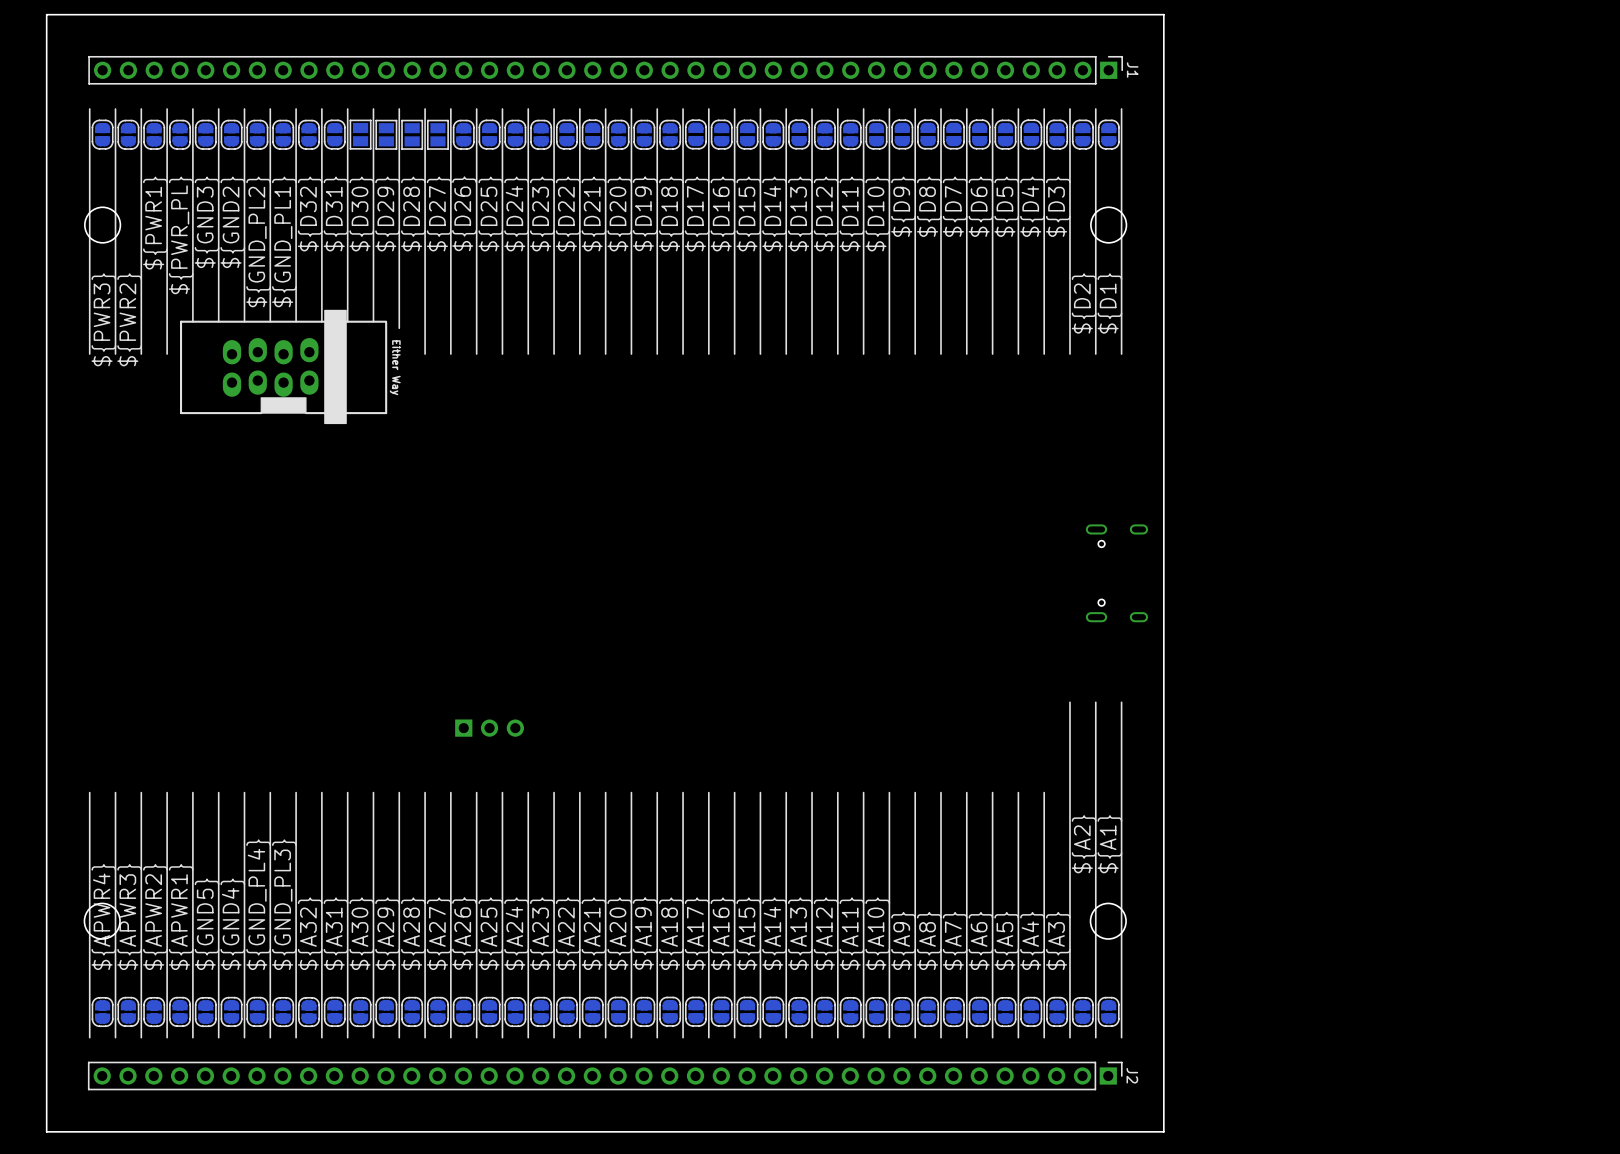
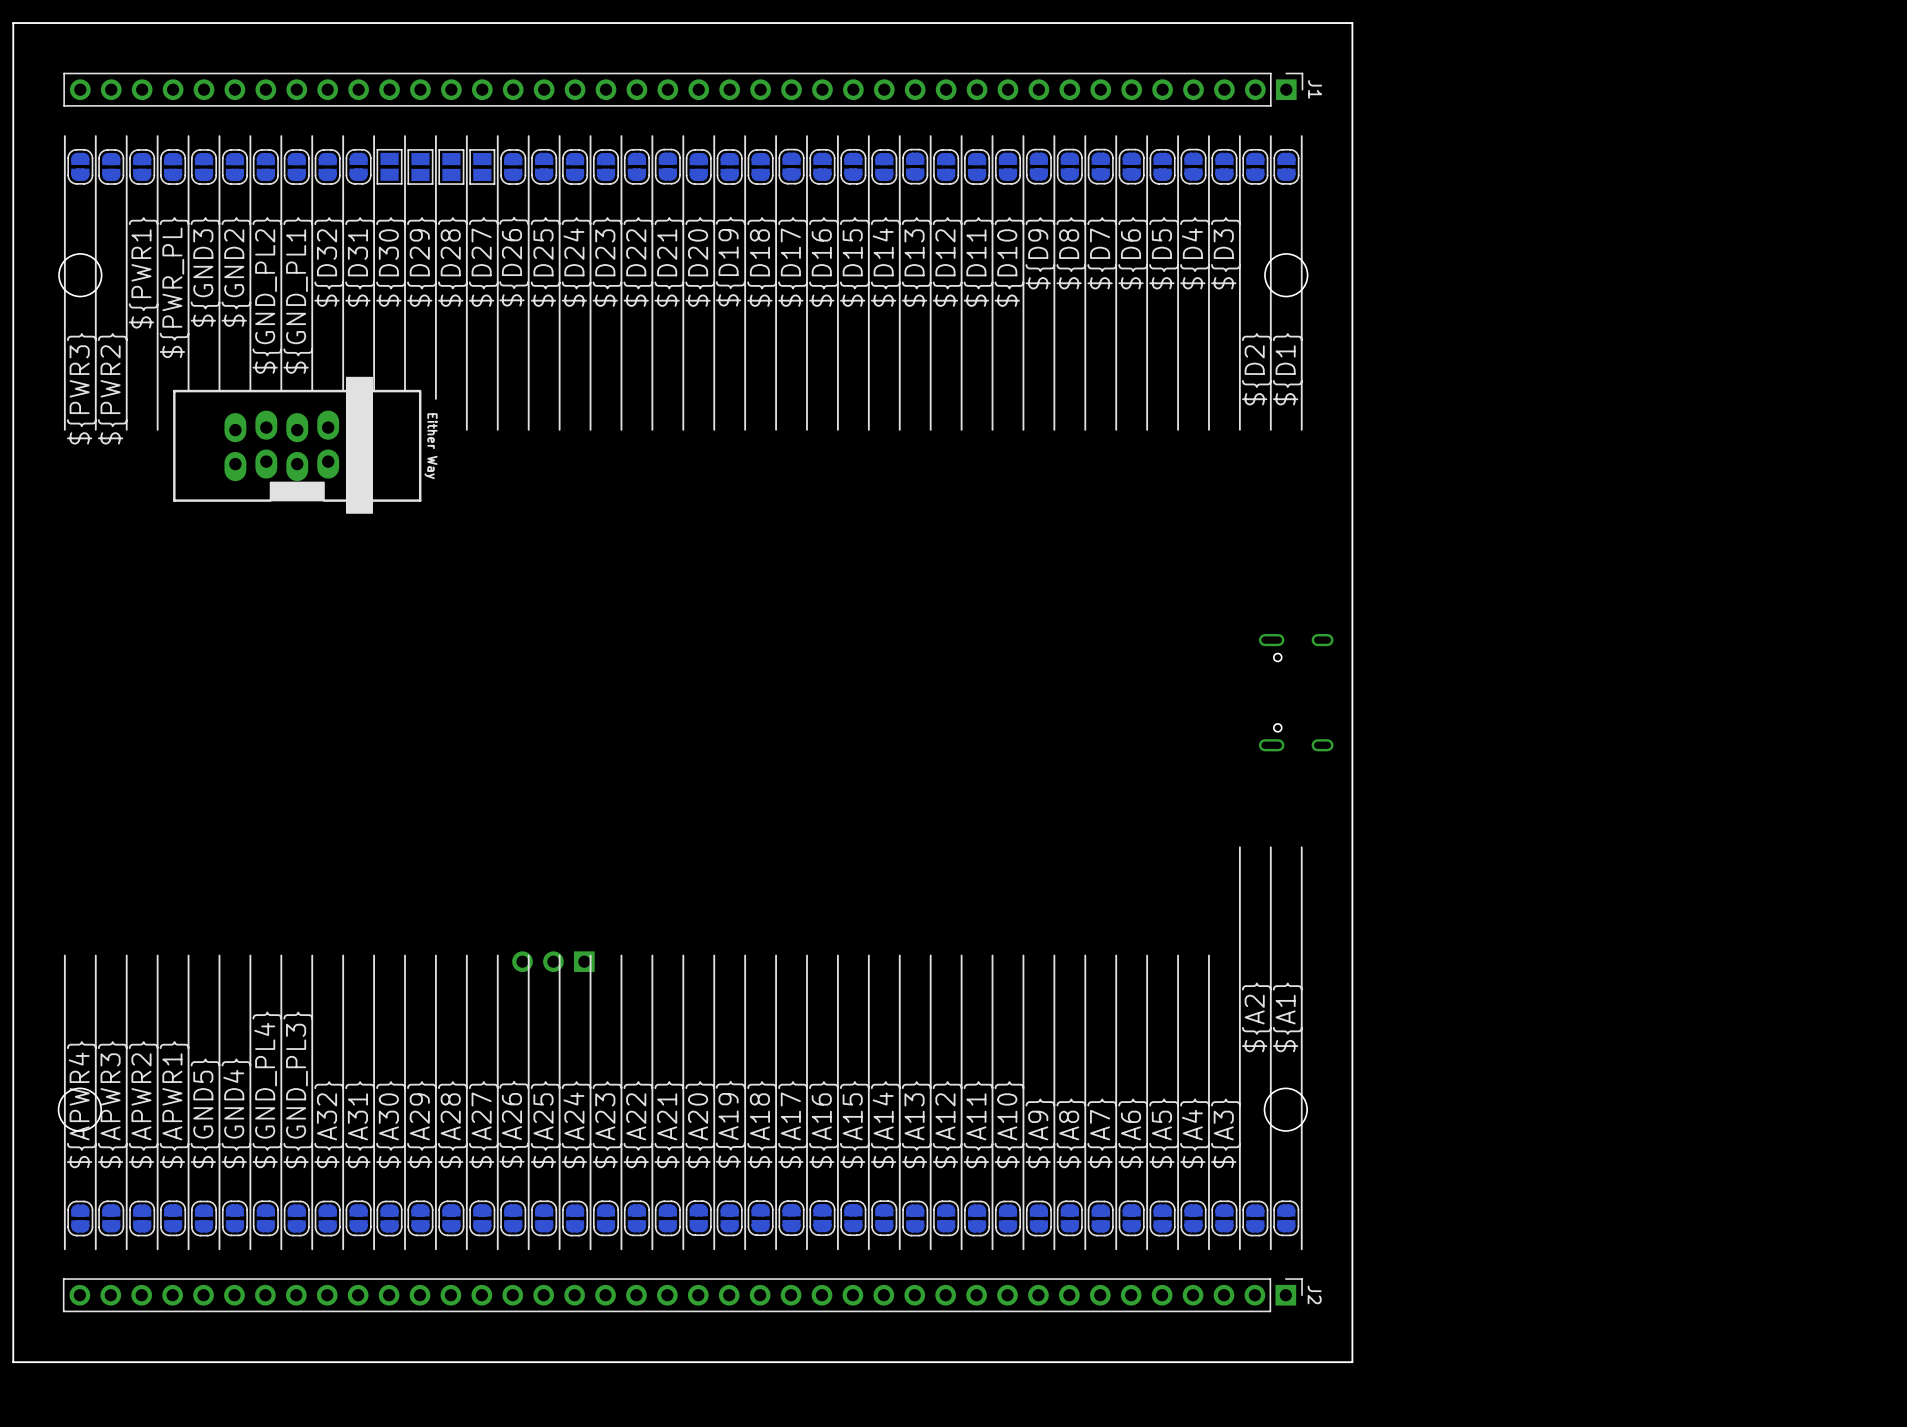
part rotation: 0° (489, 728) -> 180° (553, 961)
part position: (489, 728) -> (553, 961)

